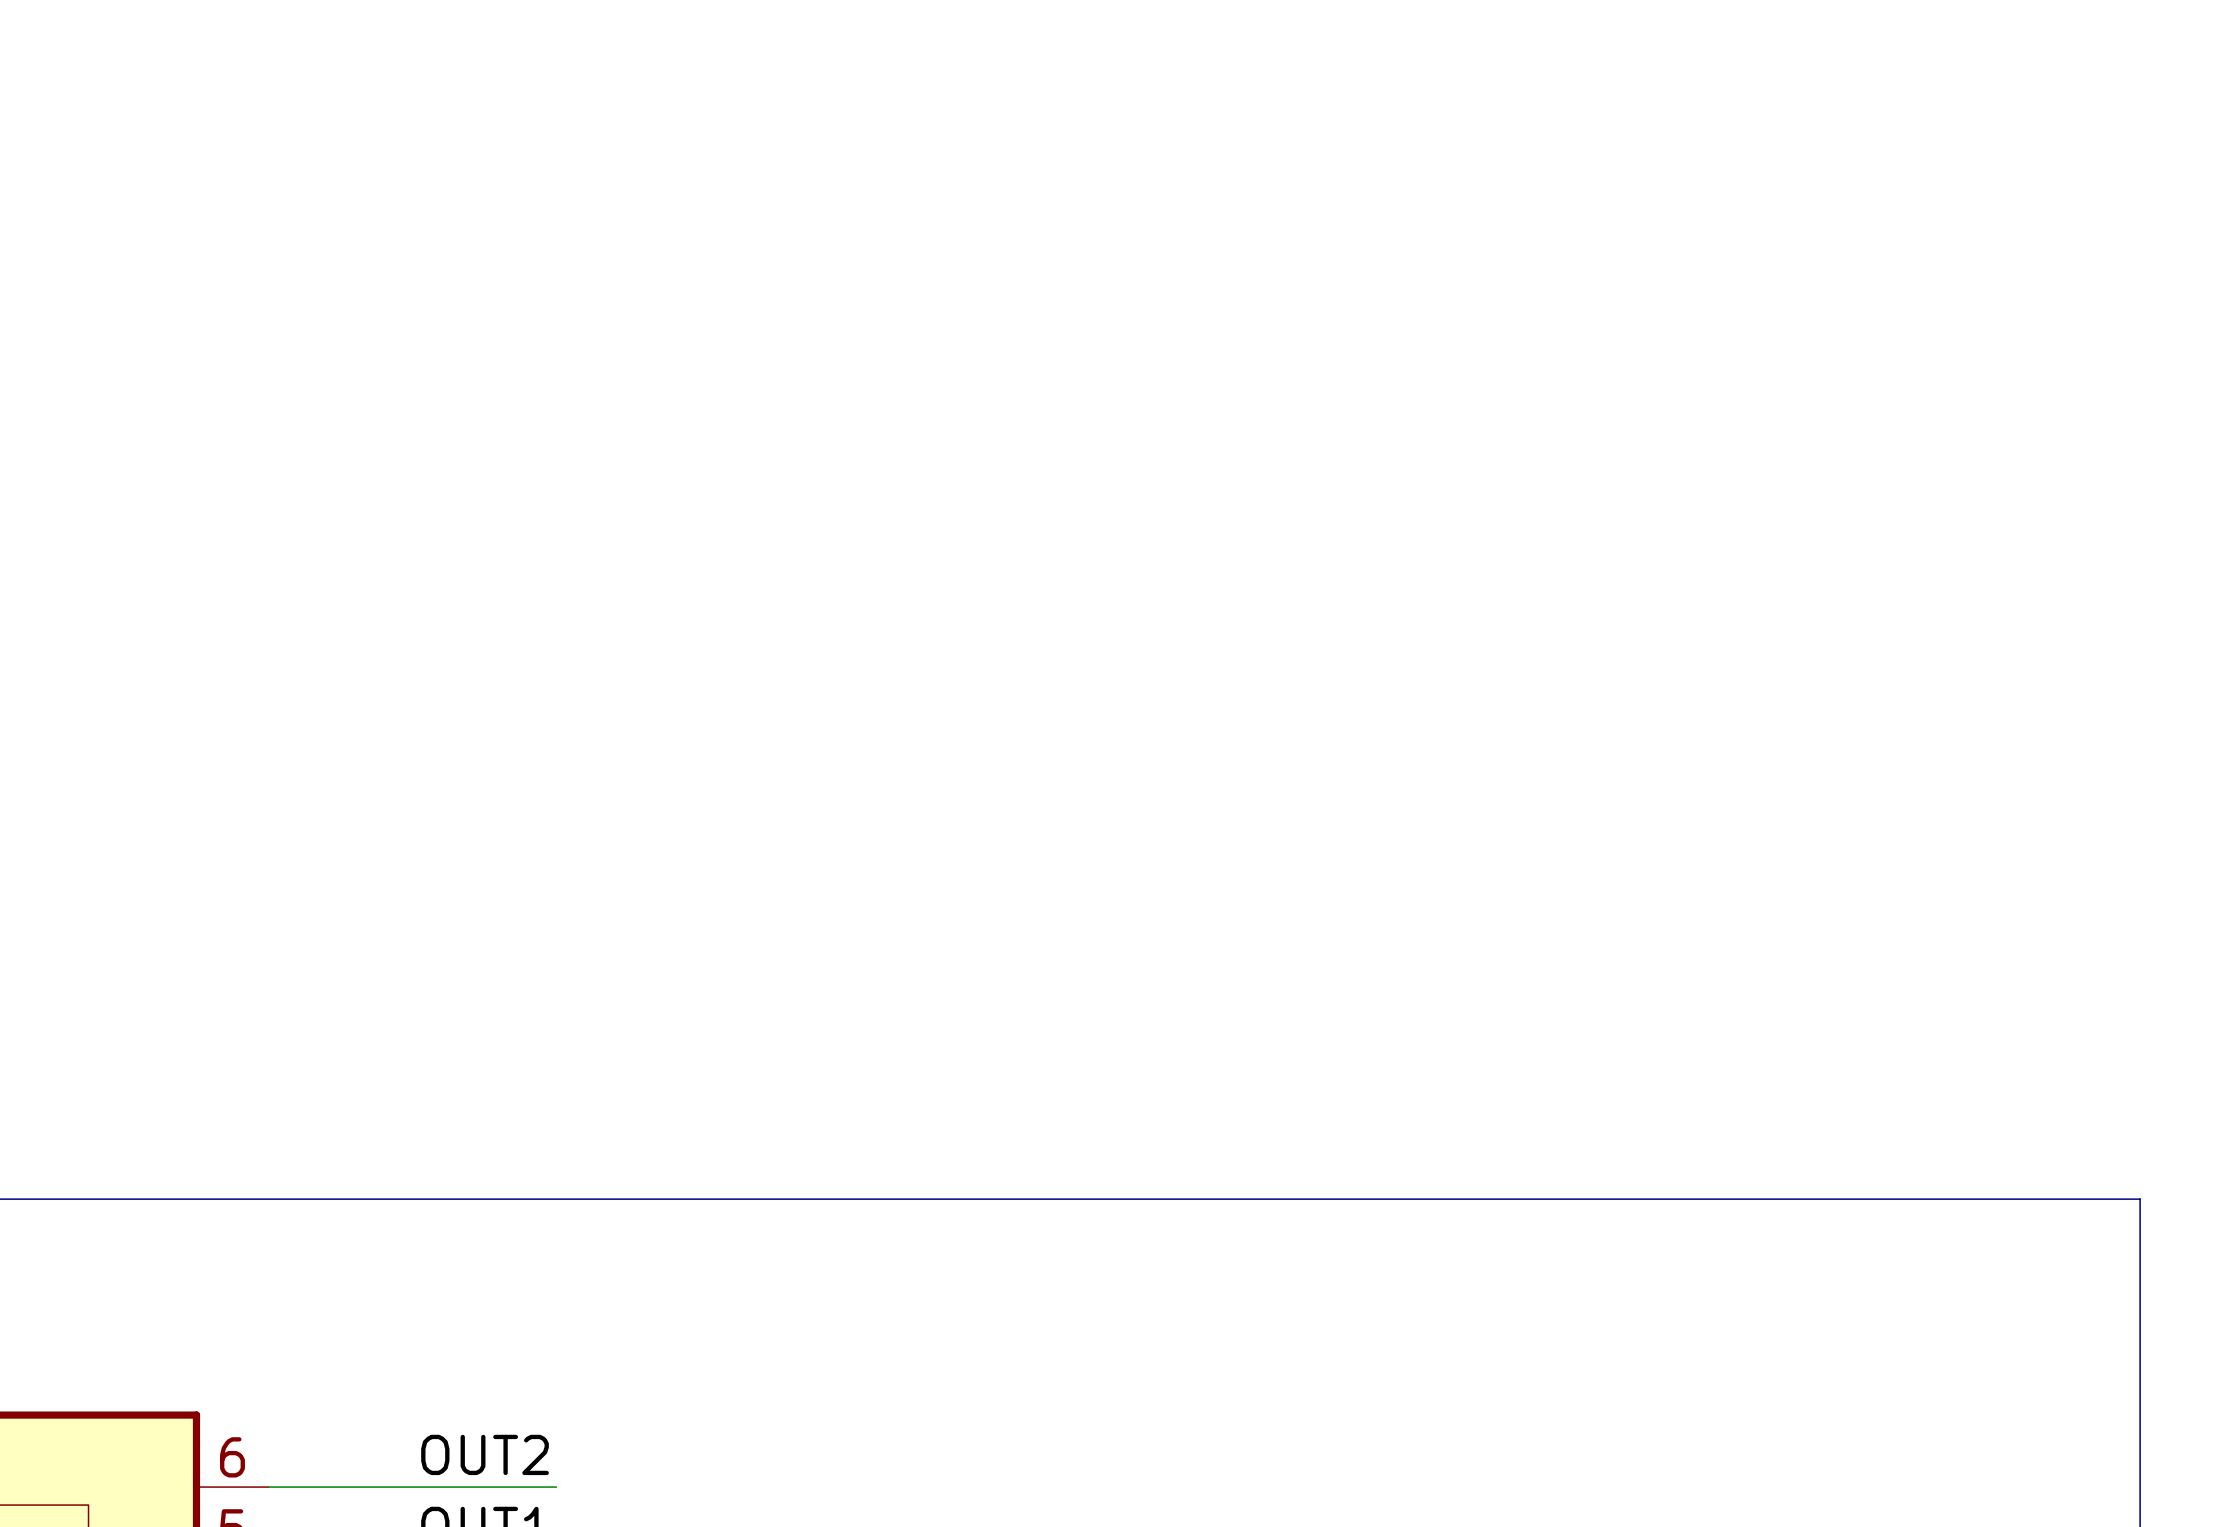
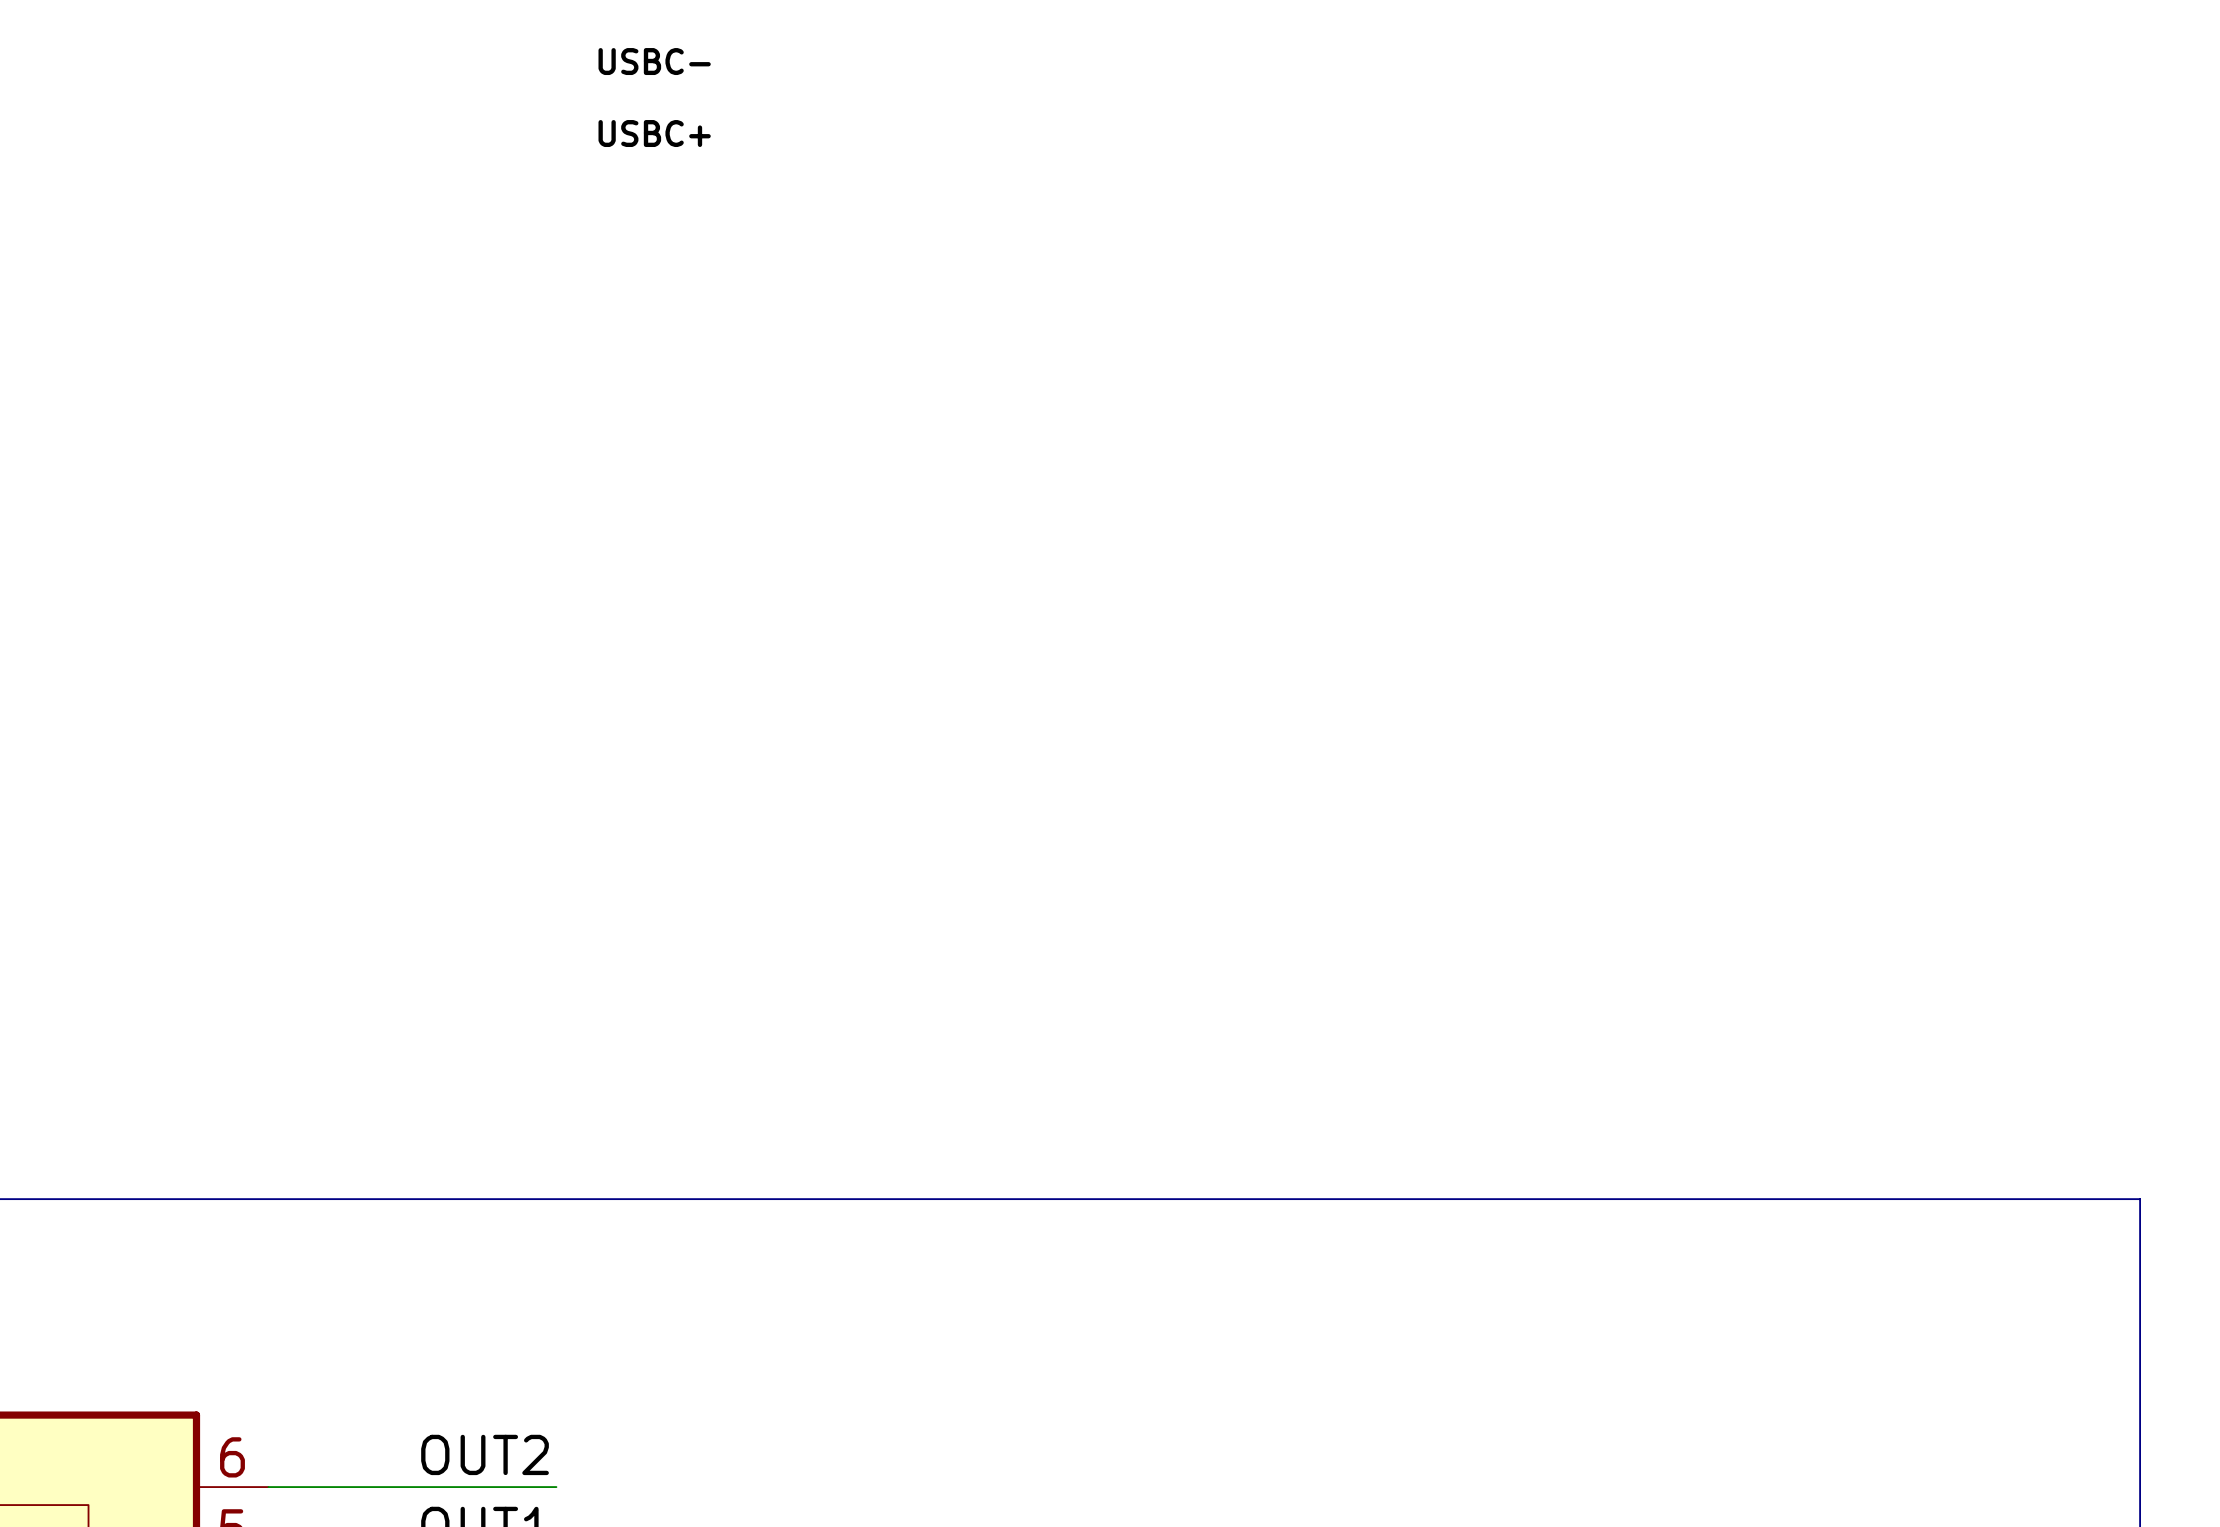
label: none -> USBC- (654, 61)
label: none -> USBC+ (654, 133)

